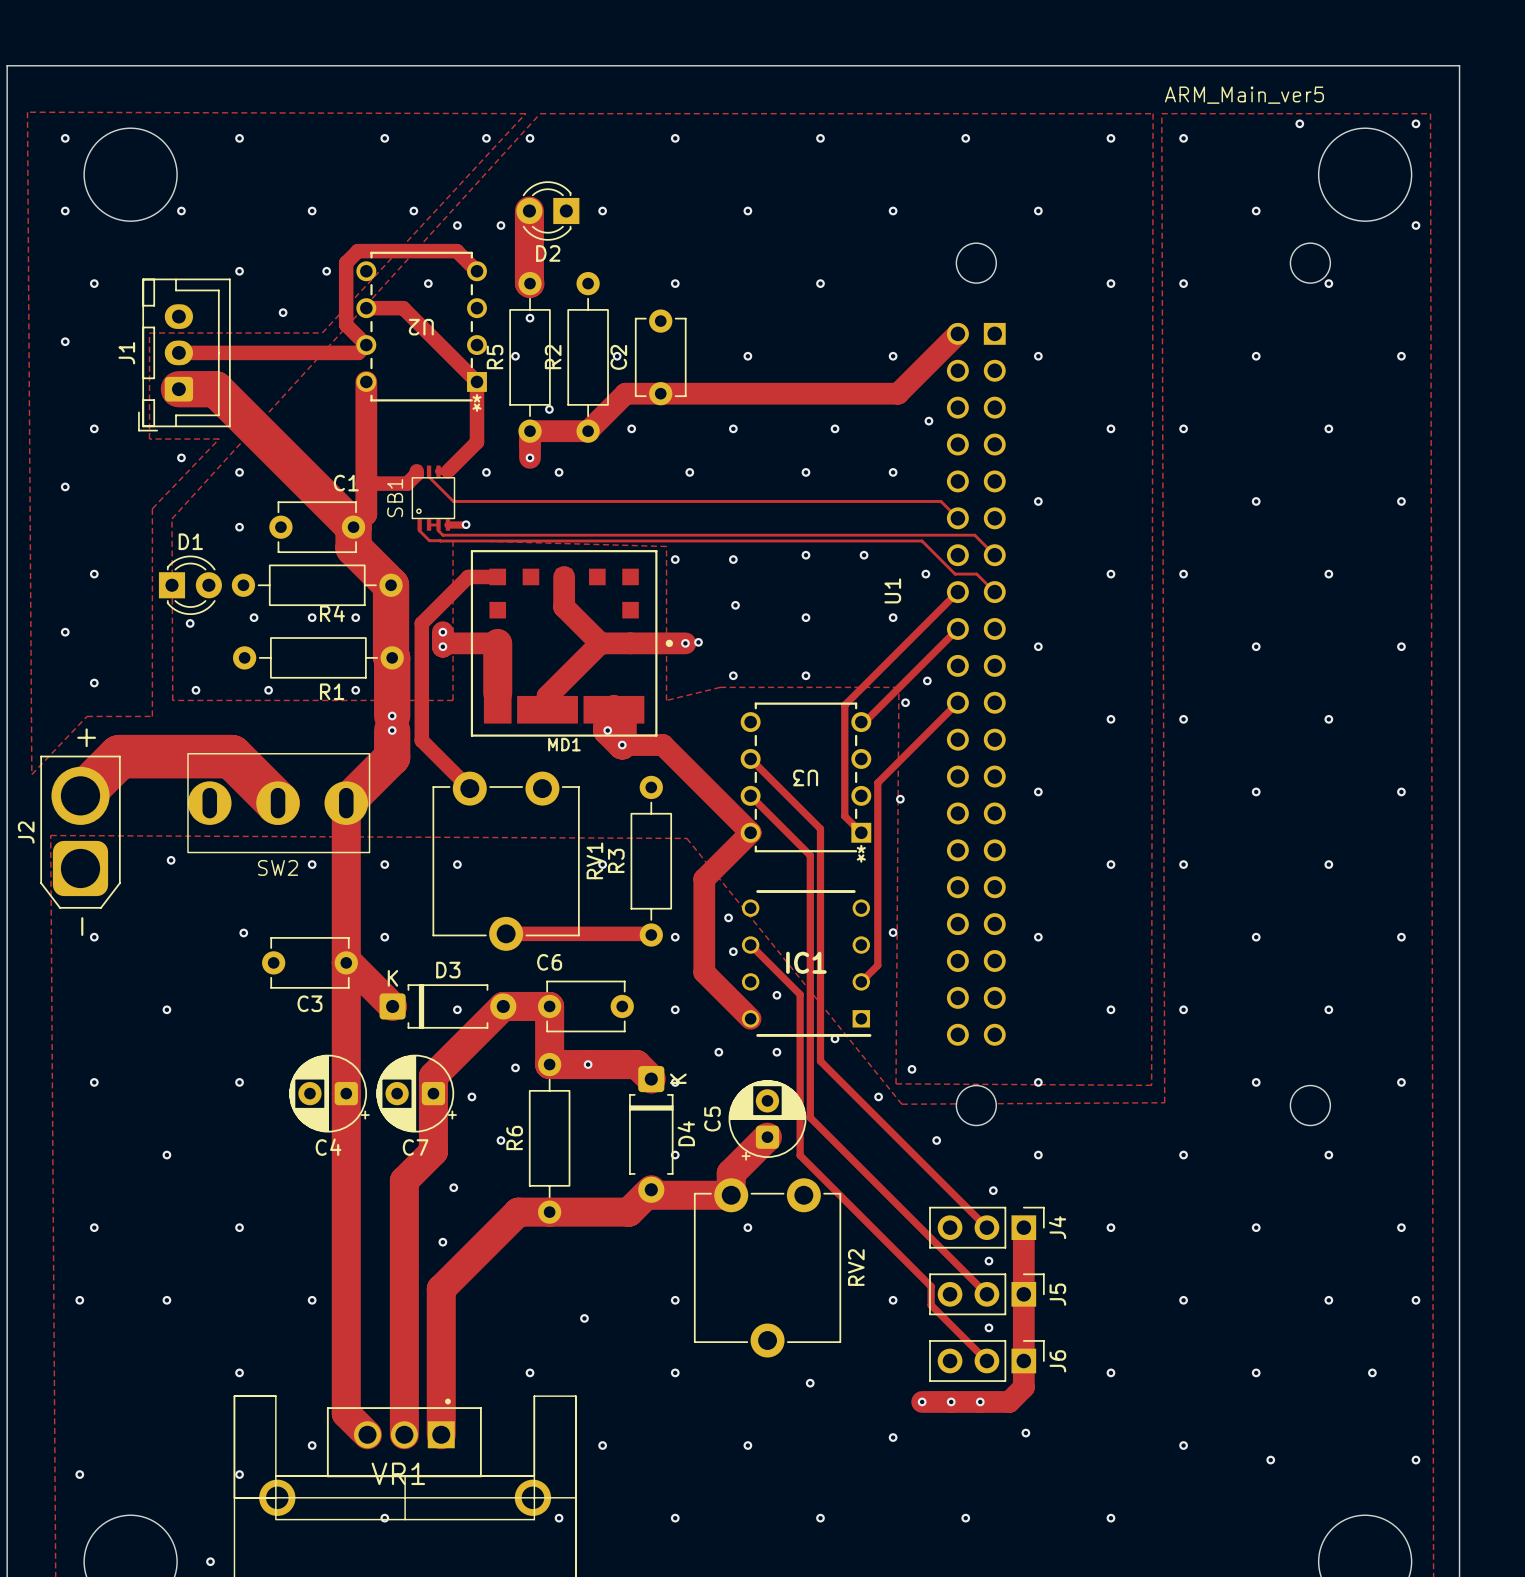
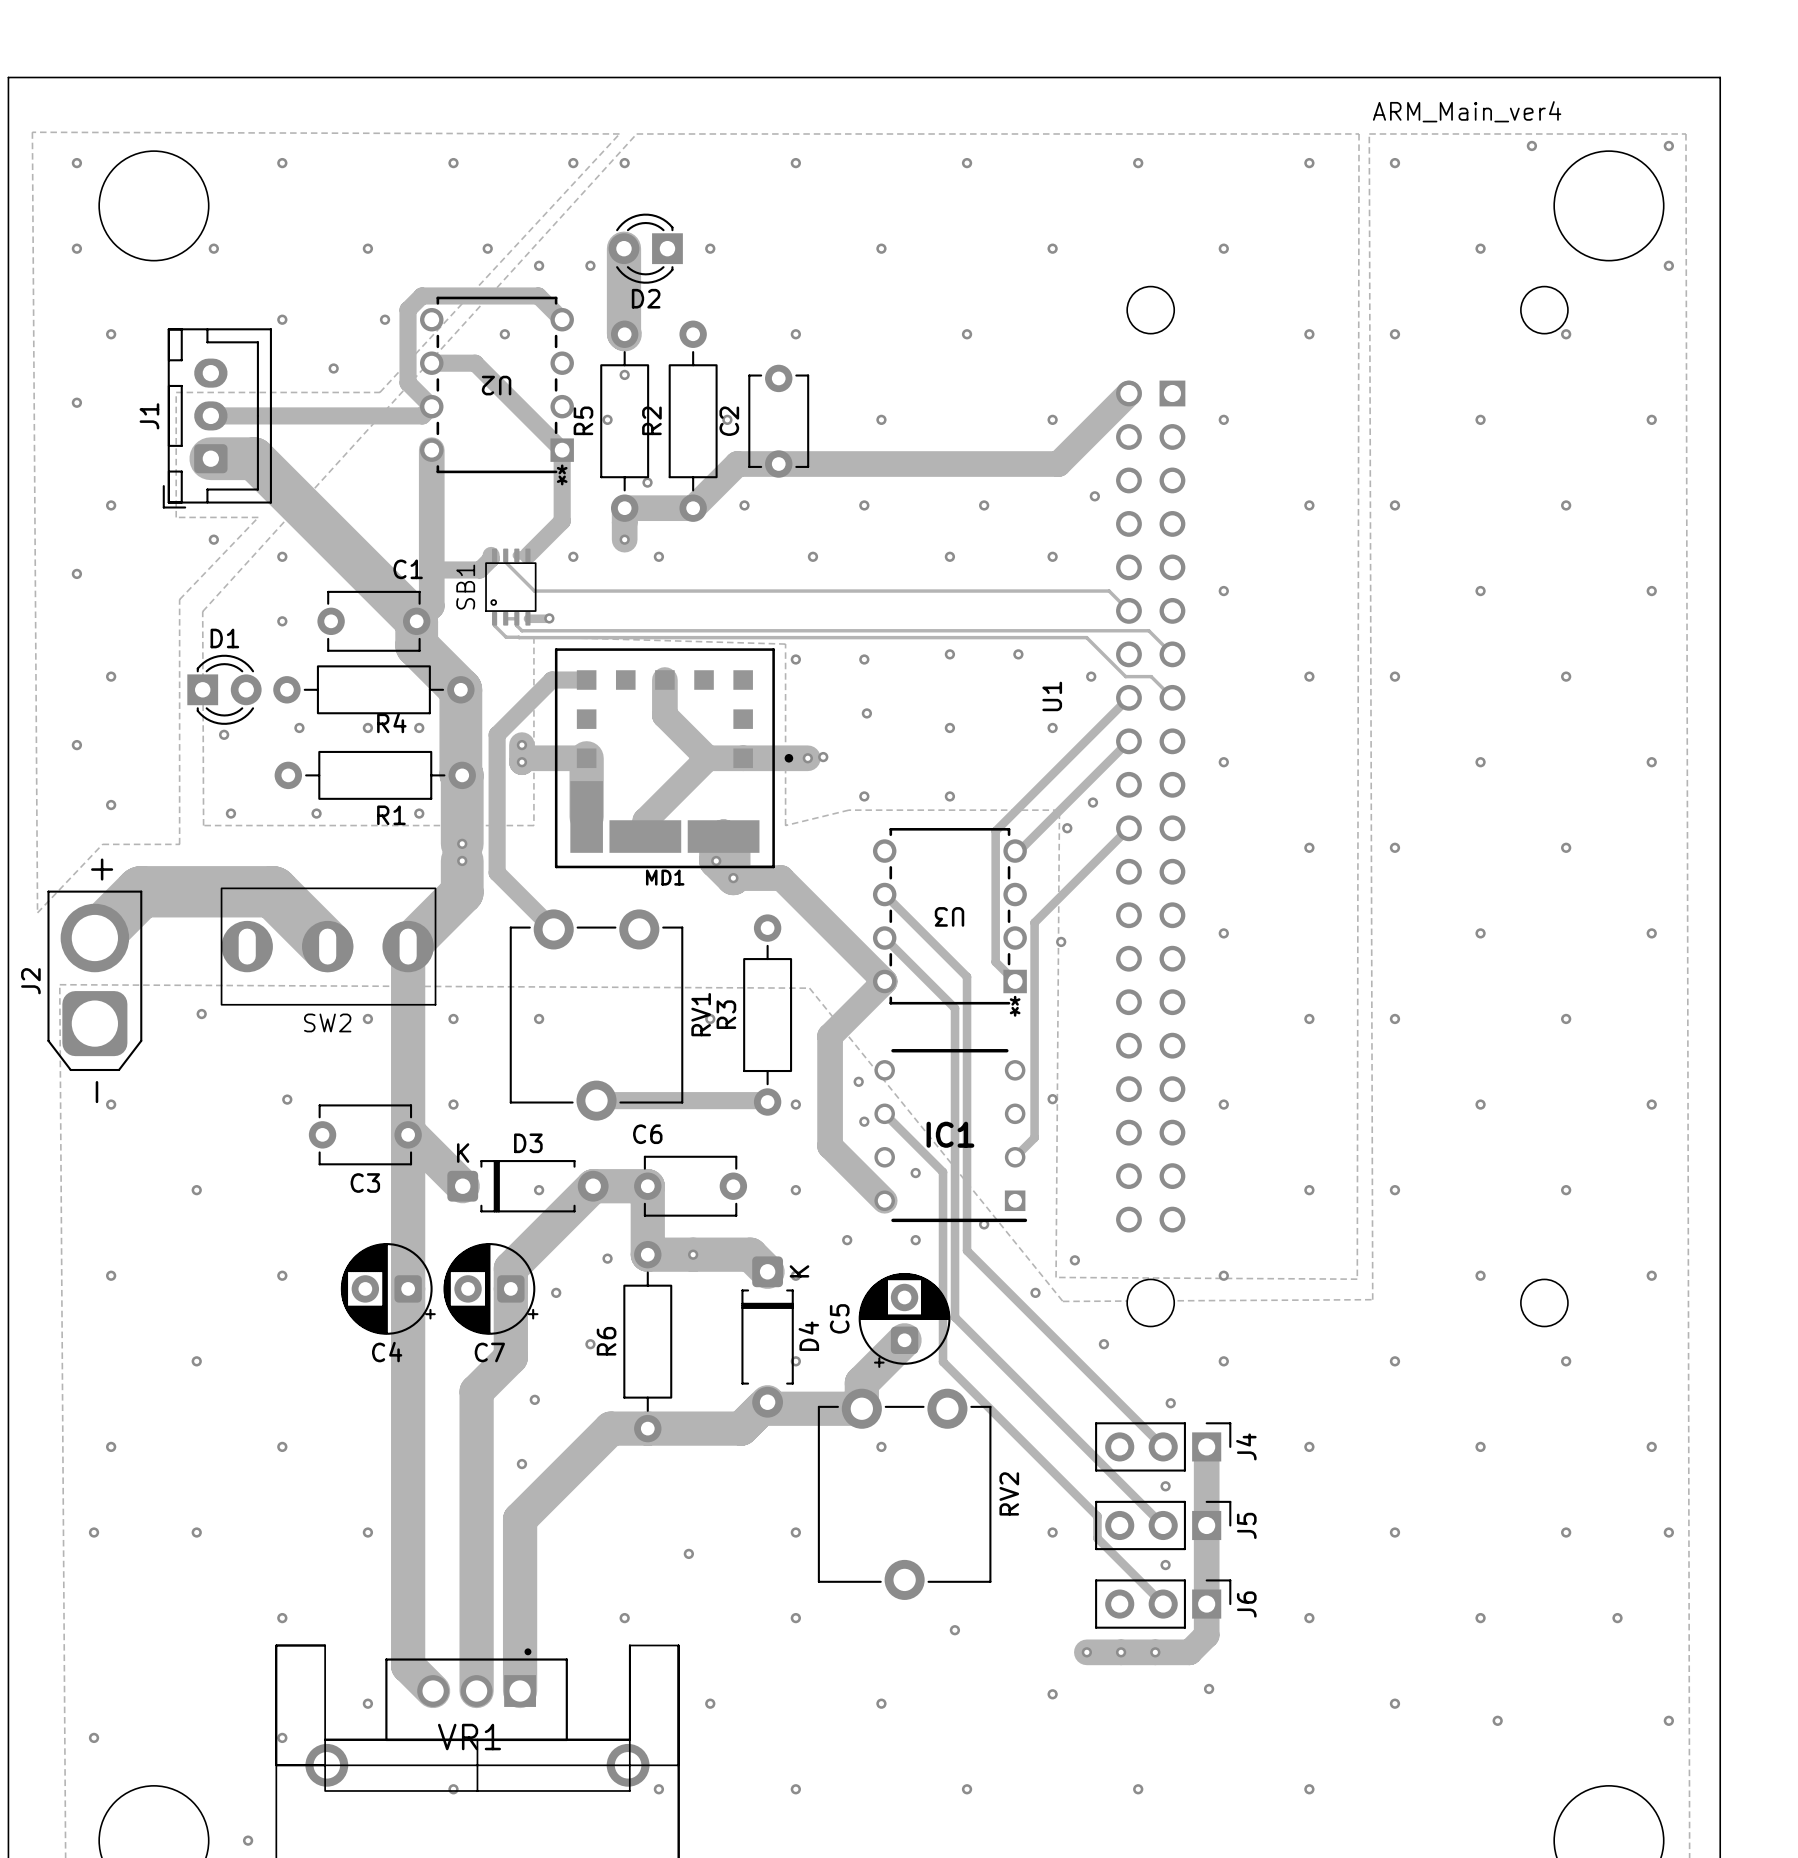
text: ARM_Main_ver5 (1244, 95) -> ARM_Main_ver4 (1467, 111)

